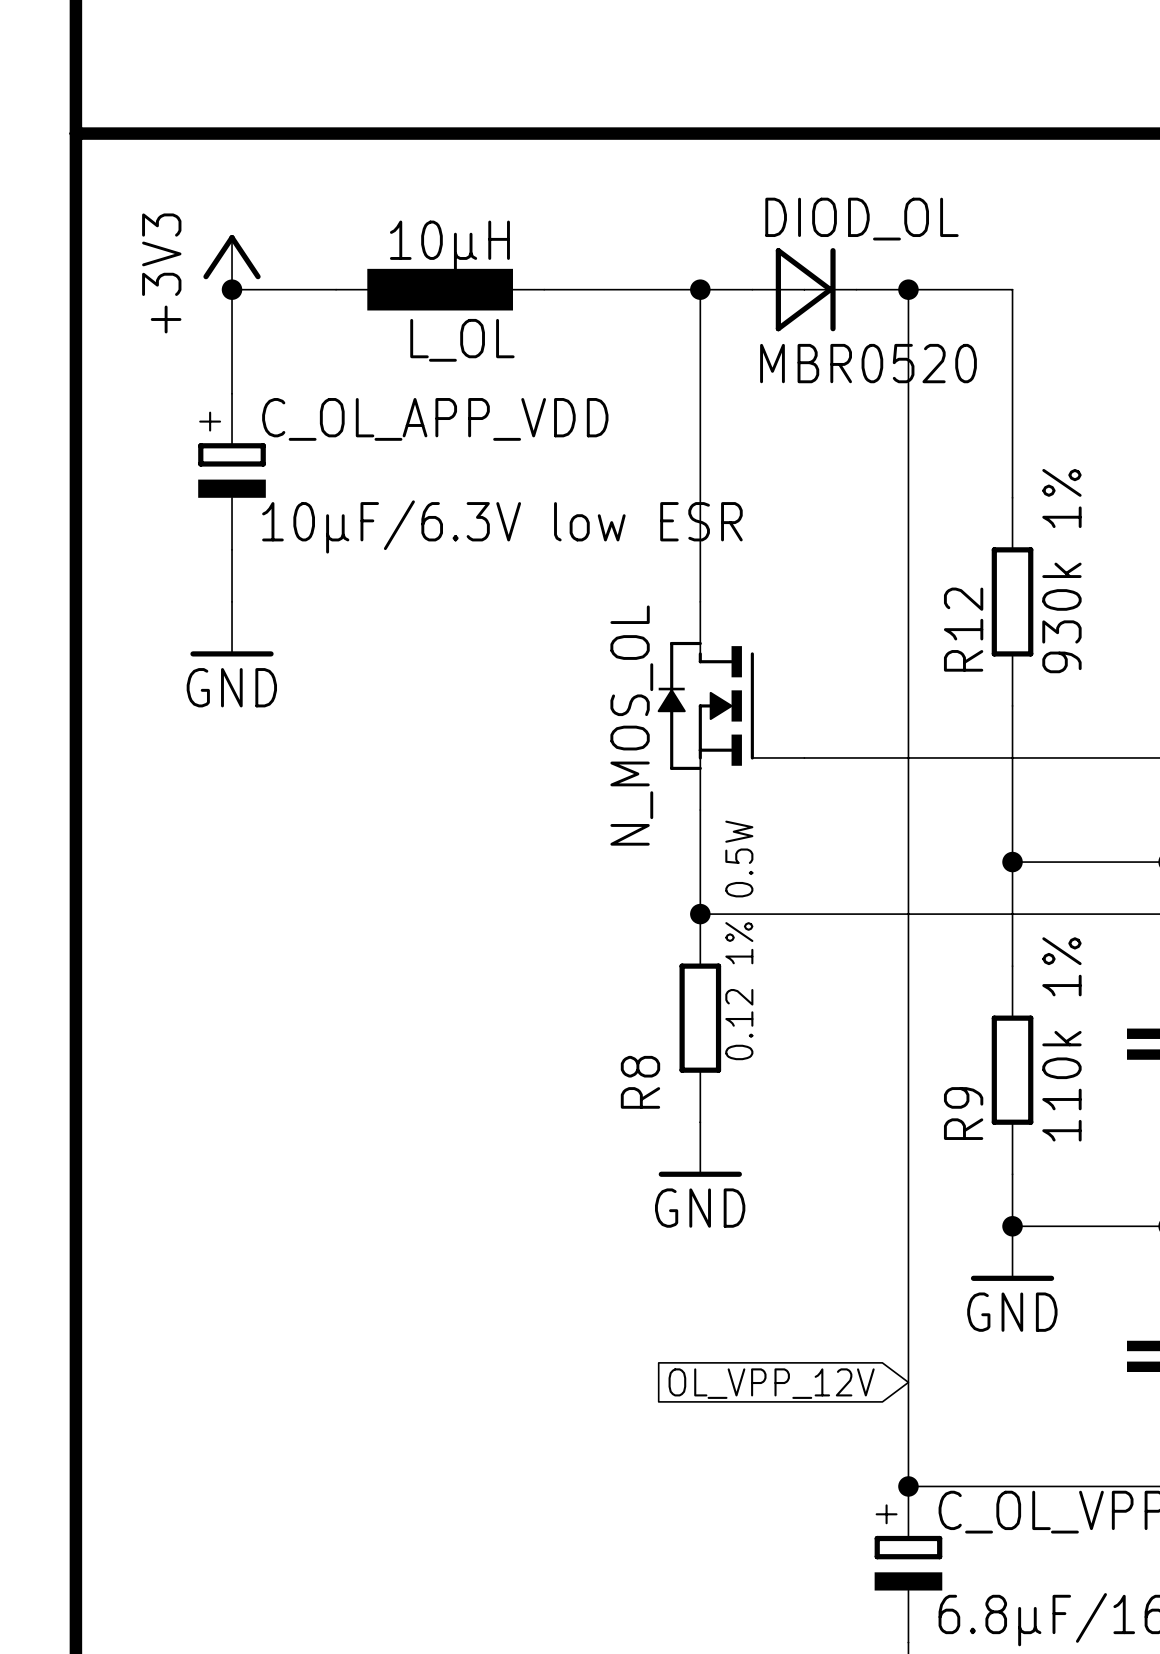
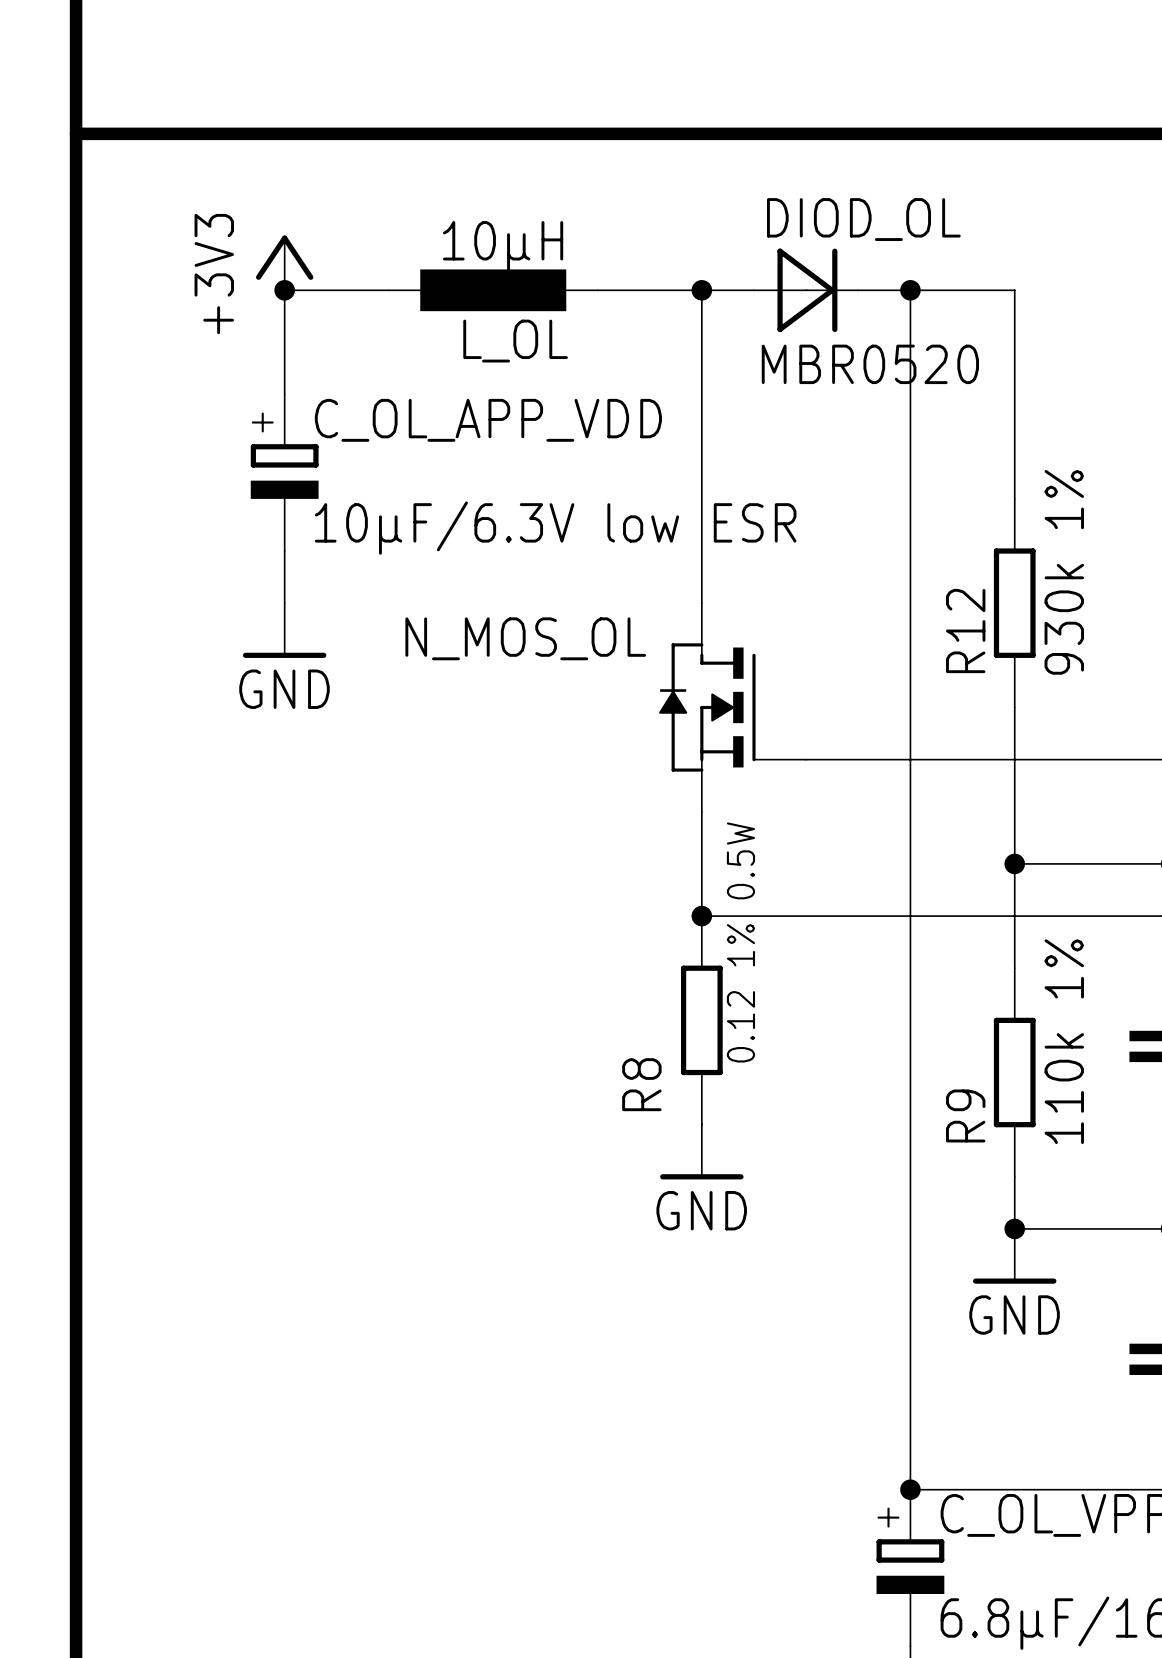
power symbol position: +3V3 (232, 262) -> +3V3 (284, 262)
junction position: (232, 289) -> (284, 290)
wire: (284, 289) (232, 289) (232, 393) -> (284, 290) (284, 394)
L_OL position: (440, 289) -> (493, 290)
C_OL_APP_VDD position: (232, 471) -> (284, 472)
wire: (232, 549) (232, 601) -> (284, 551) (284, 603)
power symbol position: GND (232, 629) -> GND (284, 630)
N_MOS_OL name rotation: 0° (631, 725) -> 90° clockwise (525, 638)
global label: OL_VPP_12V (771, 1383) -> none

